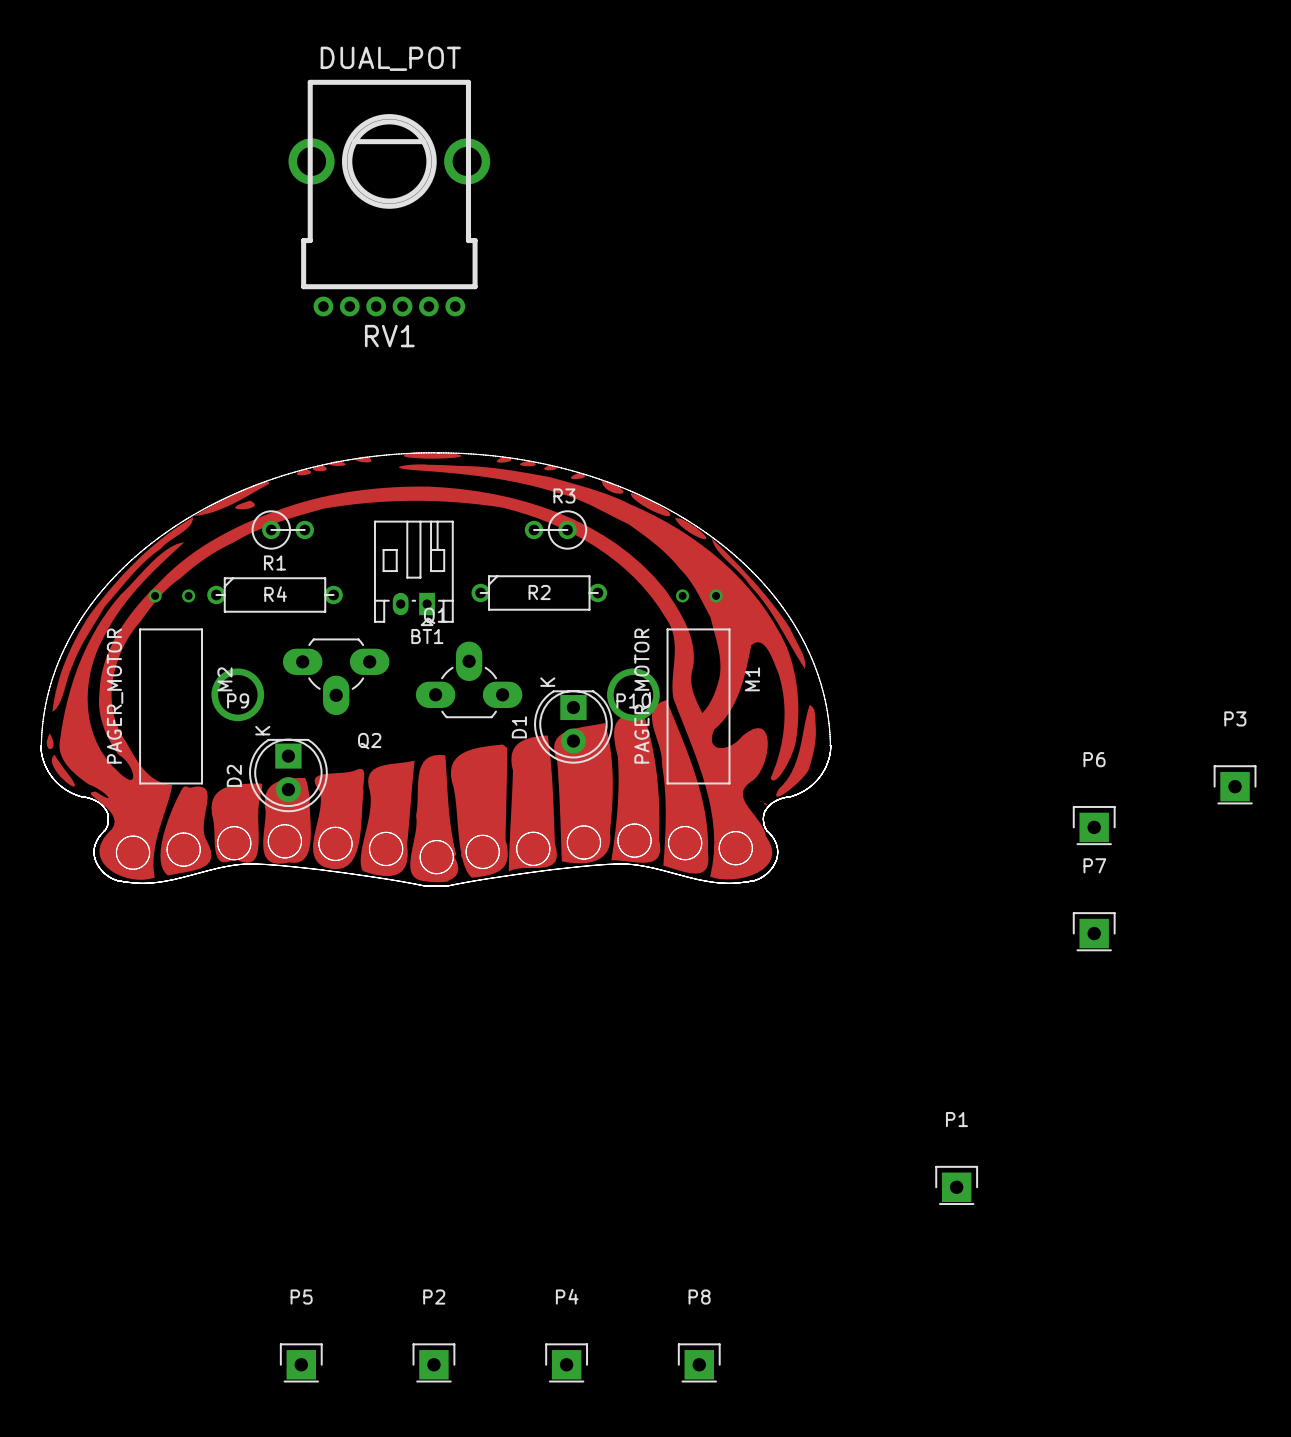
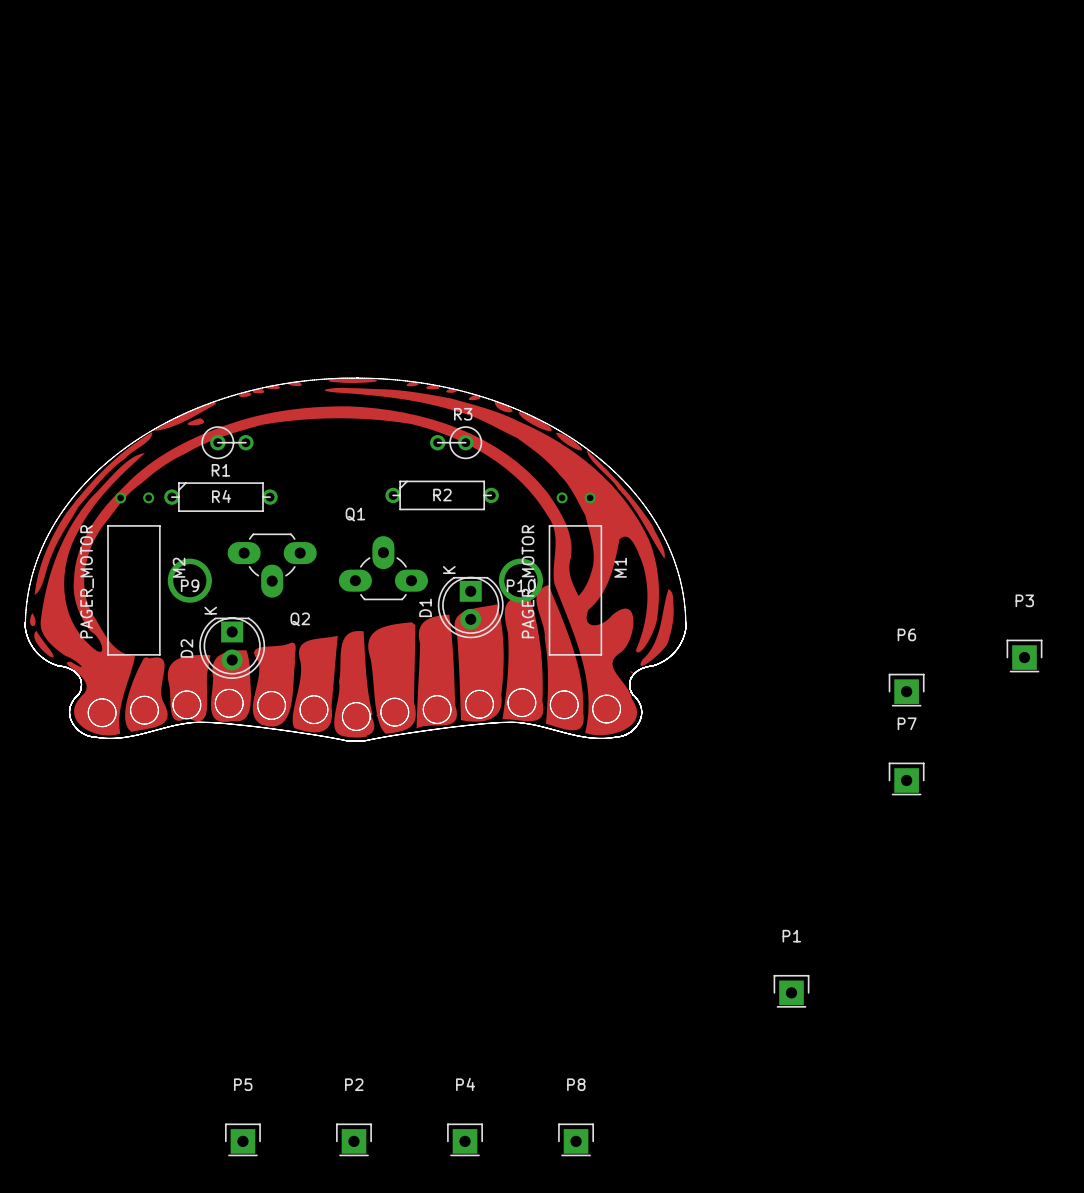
RV1: DUAL_POT (389, 198) -> none
BT1: (413, 573) -> none

